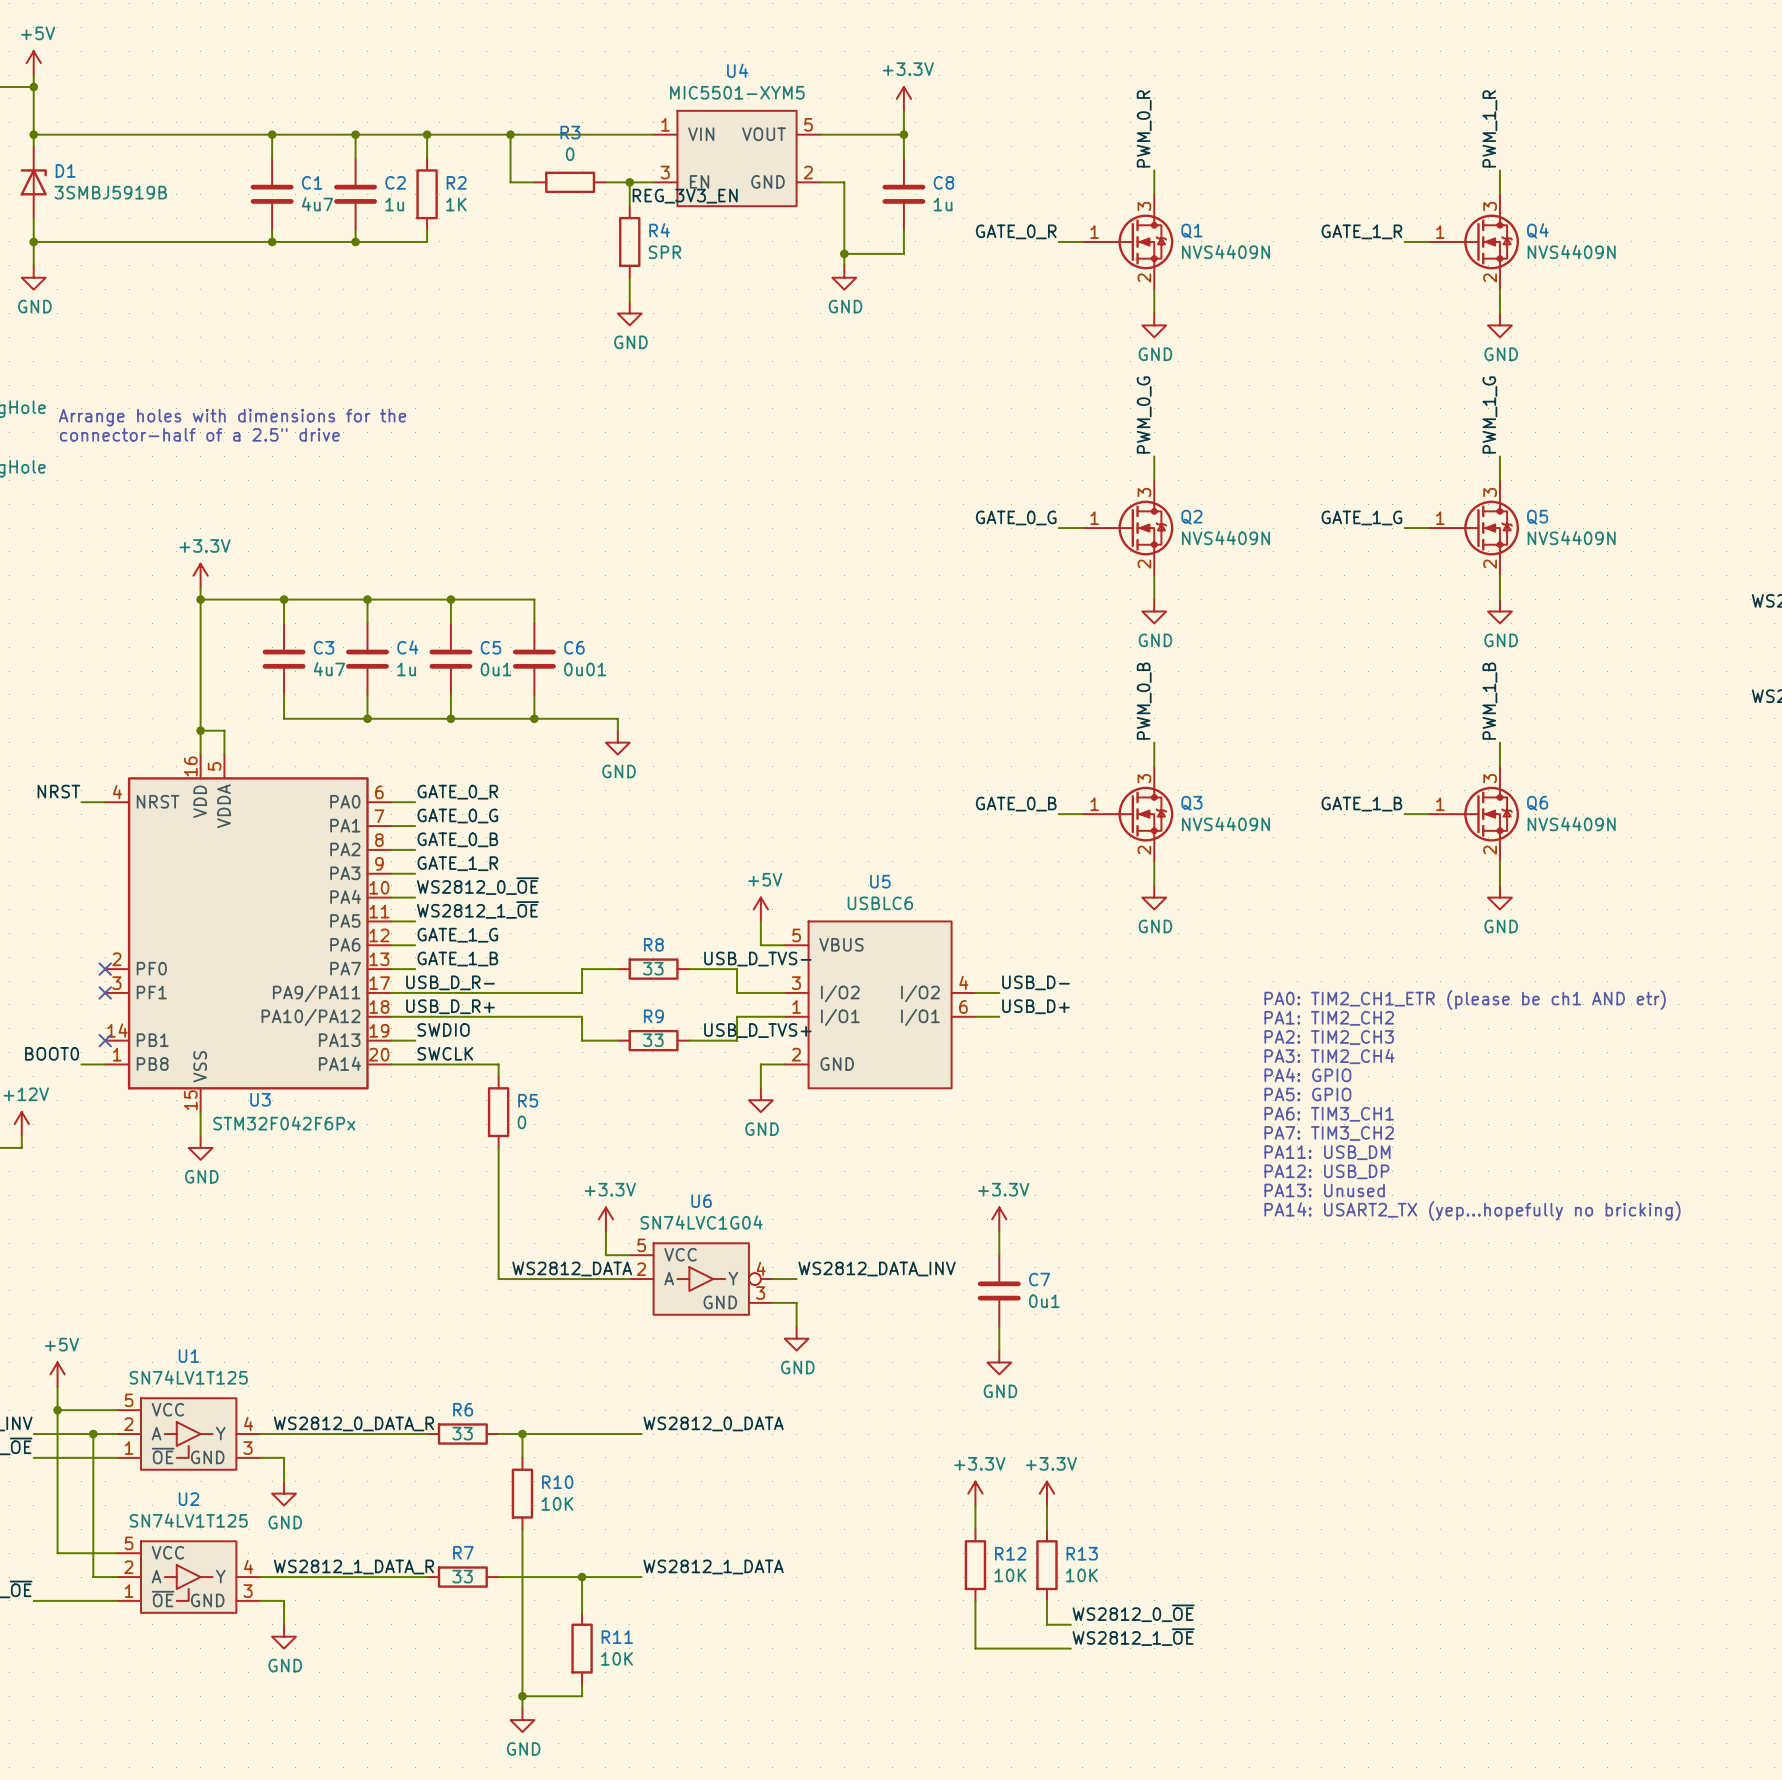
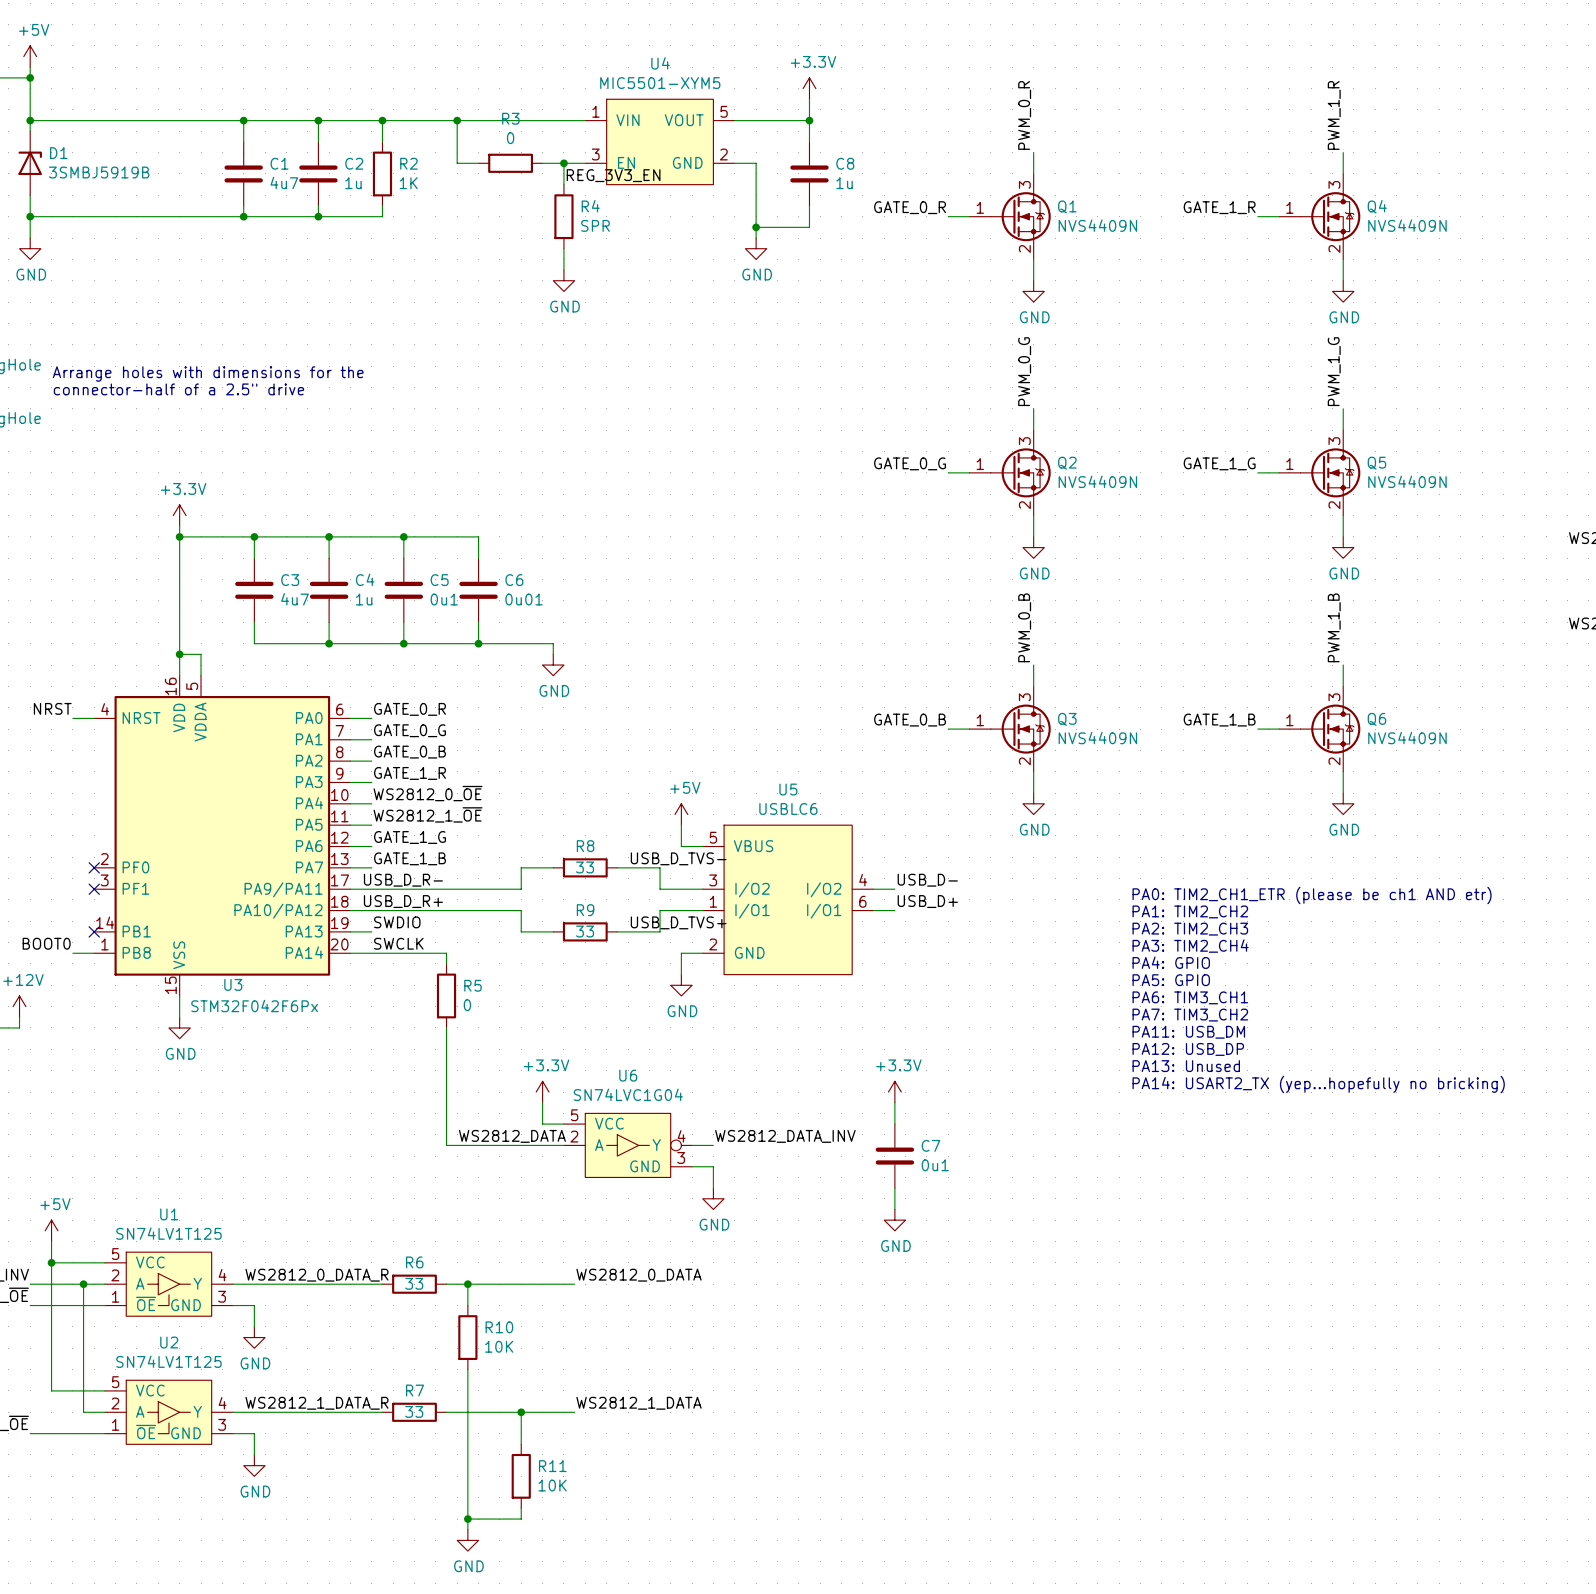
power symbol: +3.3V (975, 1493) -> none
power symbol: +3.3V (1046, 1493) -> none
wire: (975, 1505) (975, 1529) -> none
wire: (1046, 1505) (1046, 1529) -> none
R12: 10K (975, 1565) -> none
R13: 10K (1046, 1565) -> none
wire: (975, 1600) (975, 1648) (1070, 1648) -> none
wire: (1046, 1600) (1046, 1624) (1070, 1624) -> none
label: WS2812_0_~{OE} (1133, 1613) -> none
label: WS2812_1_~{OE} (1133, 1637) -> none

